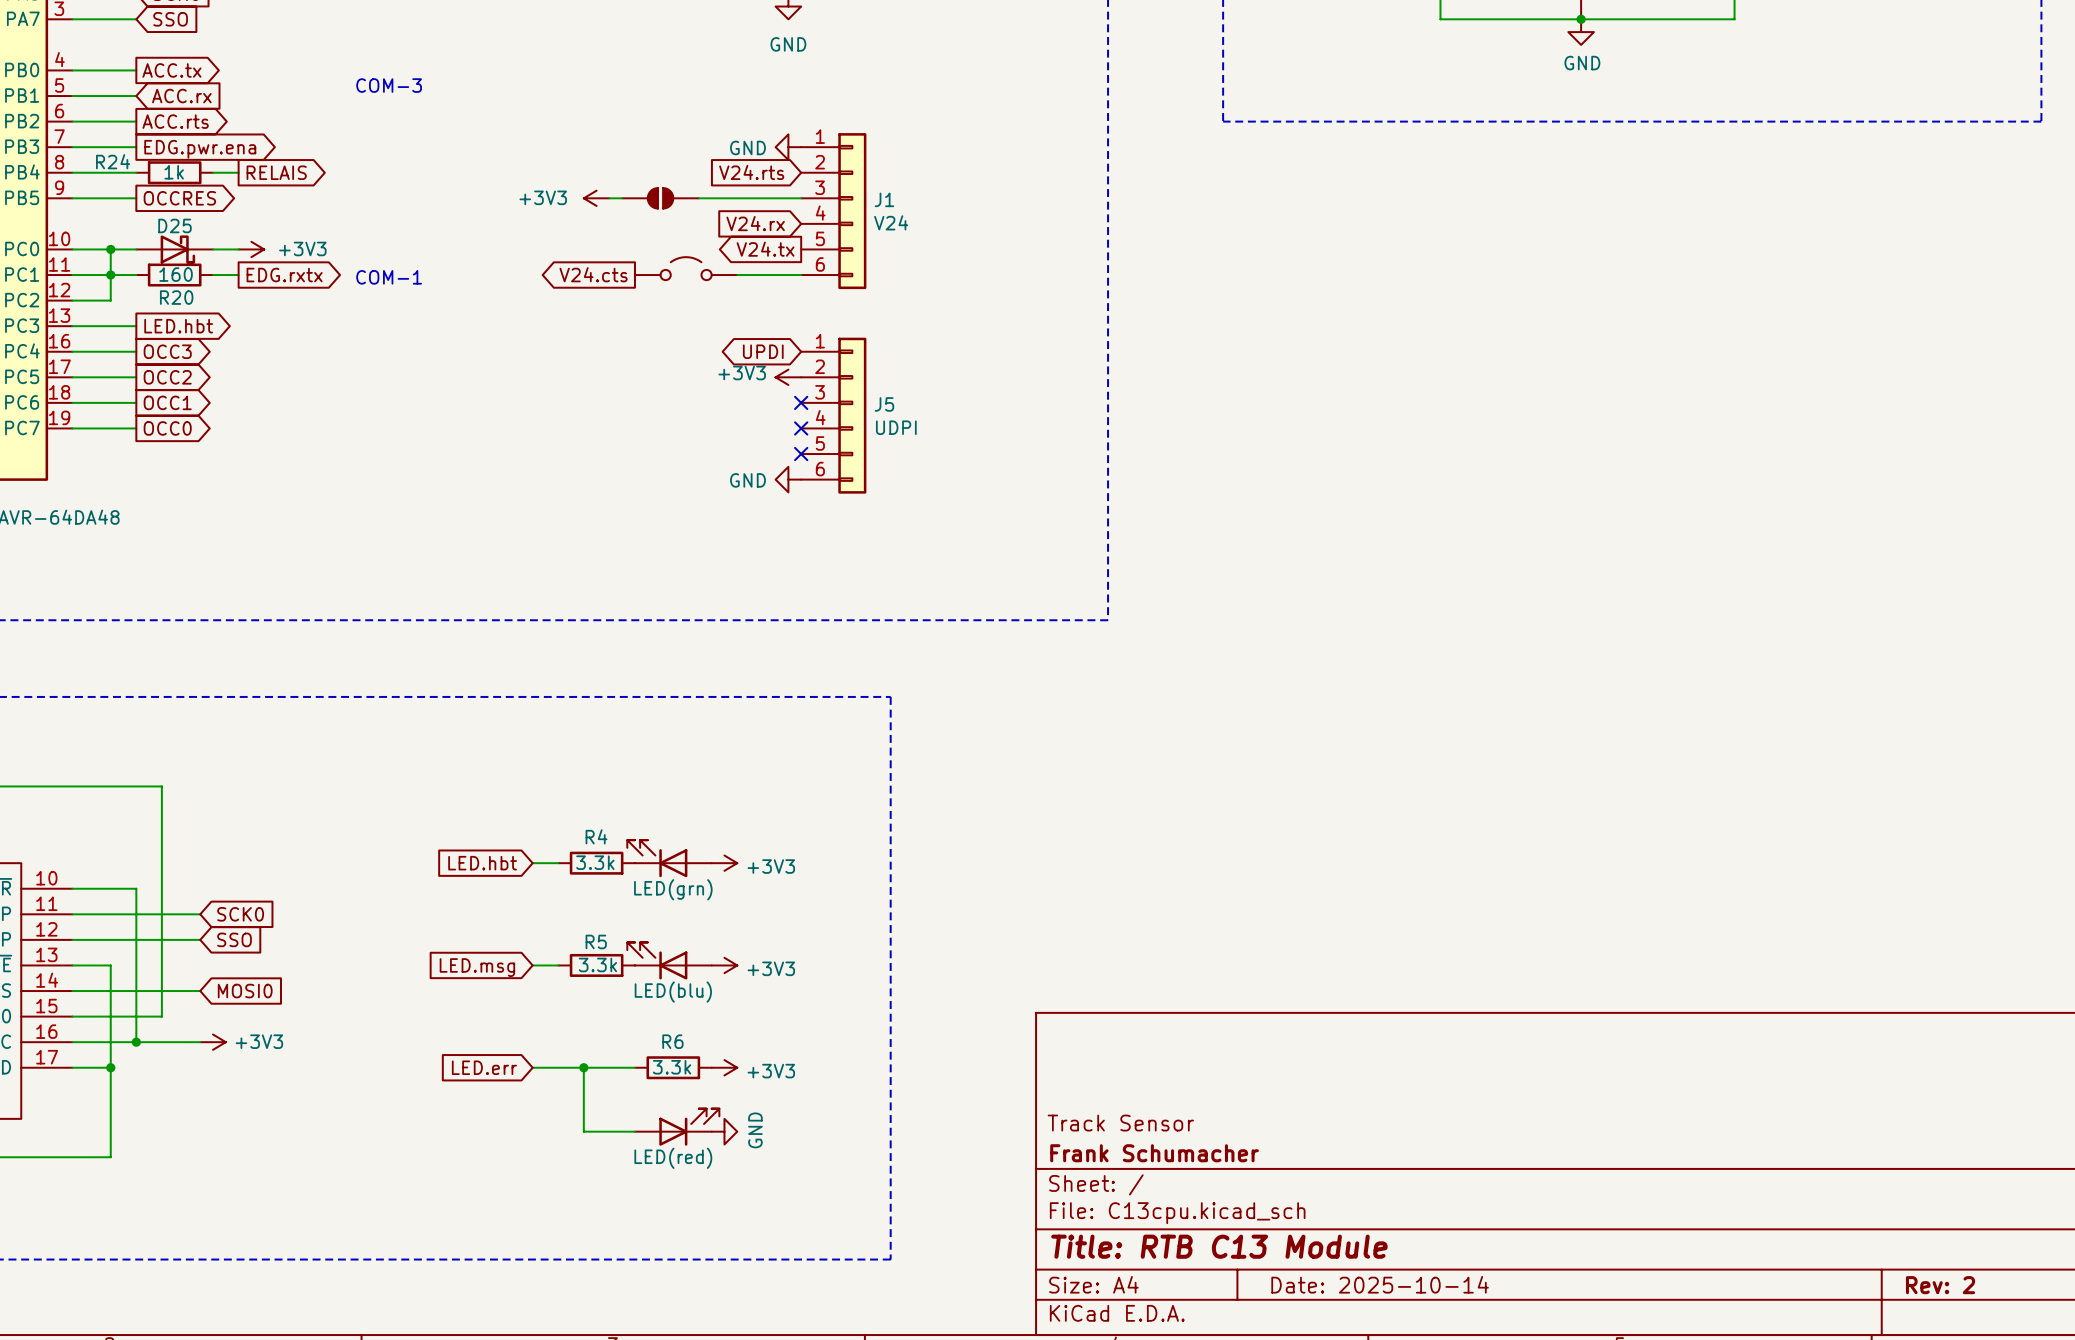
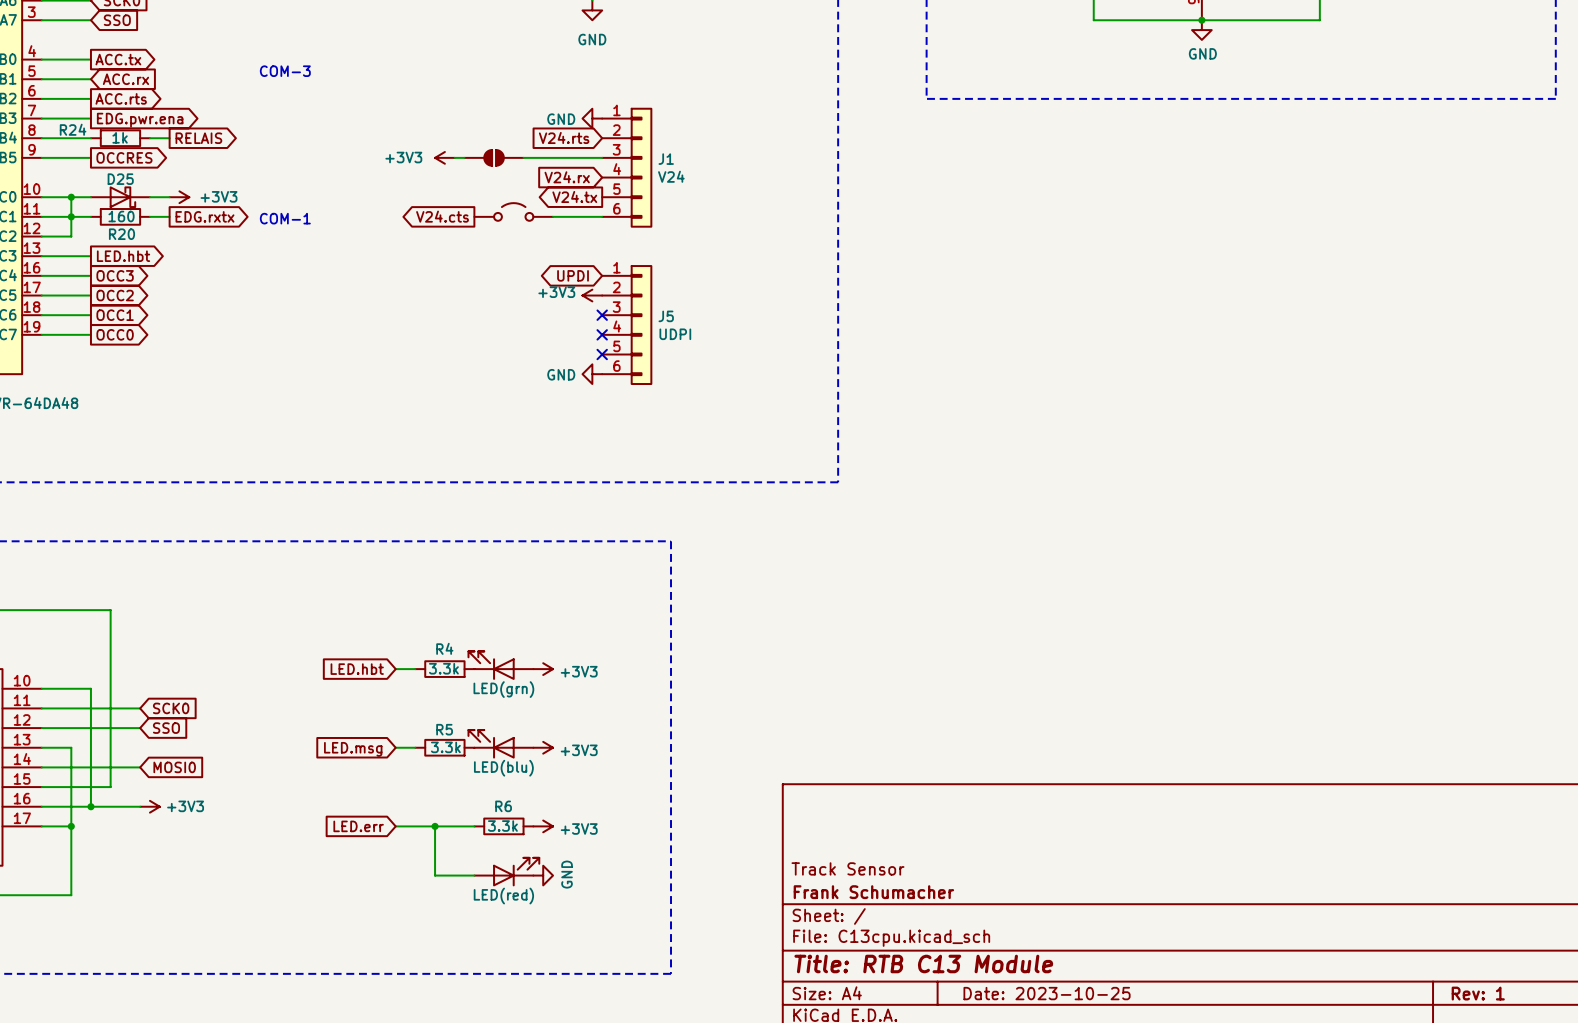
title block: Date: 2025-10-14 (1380, 1284) -> Date: 2023-10-25 (1047, 993)
title block: Rev: 2 (1940, 1285) -> Rev: 1 (1478, 993)

